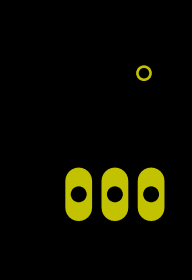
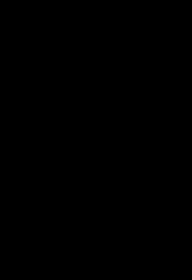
part: (143, 73) -> none
part: (114, 194) -> none

